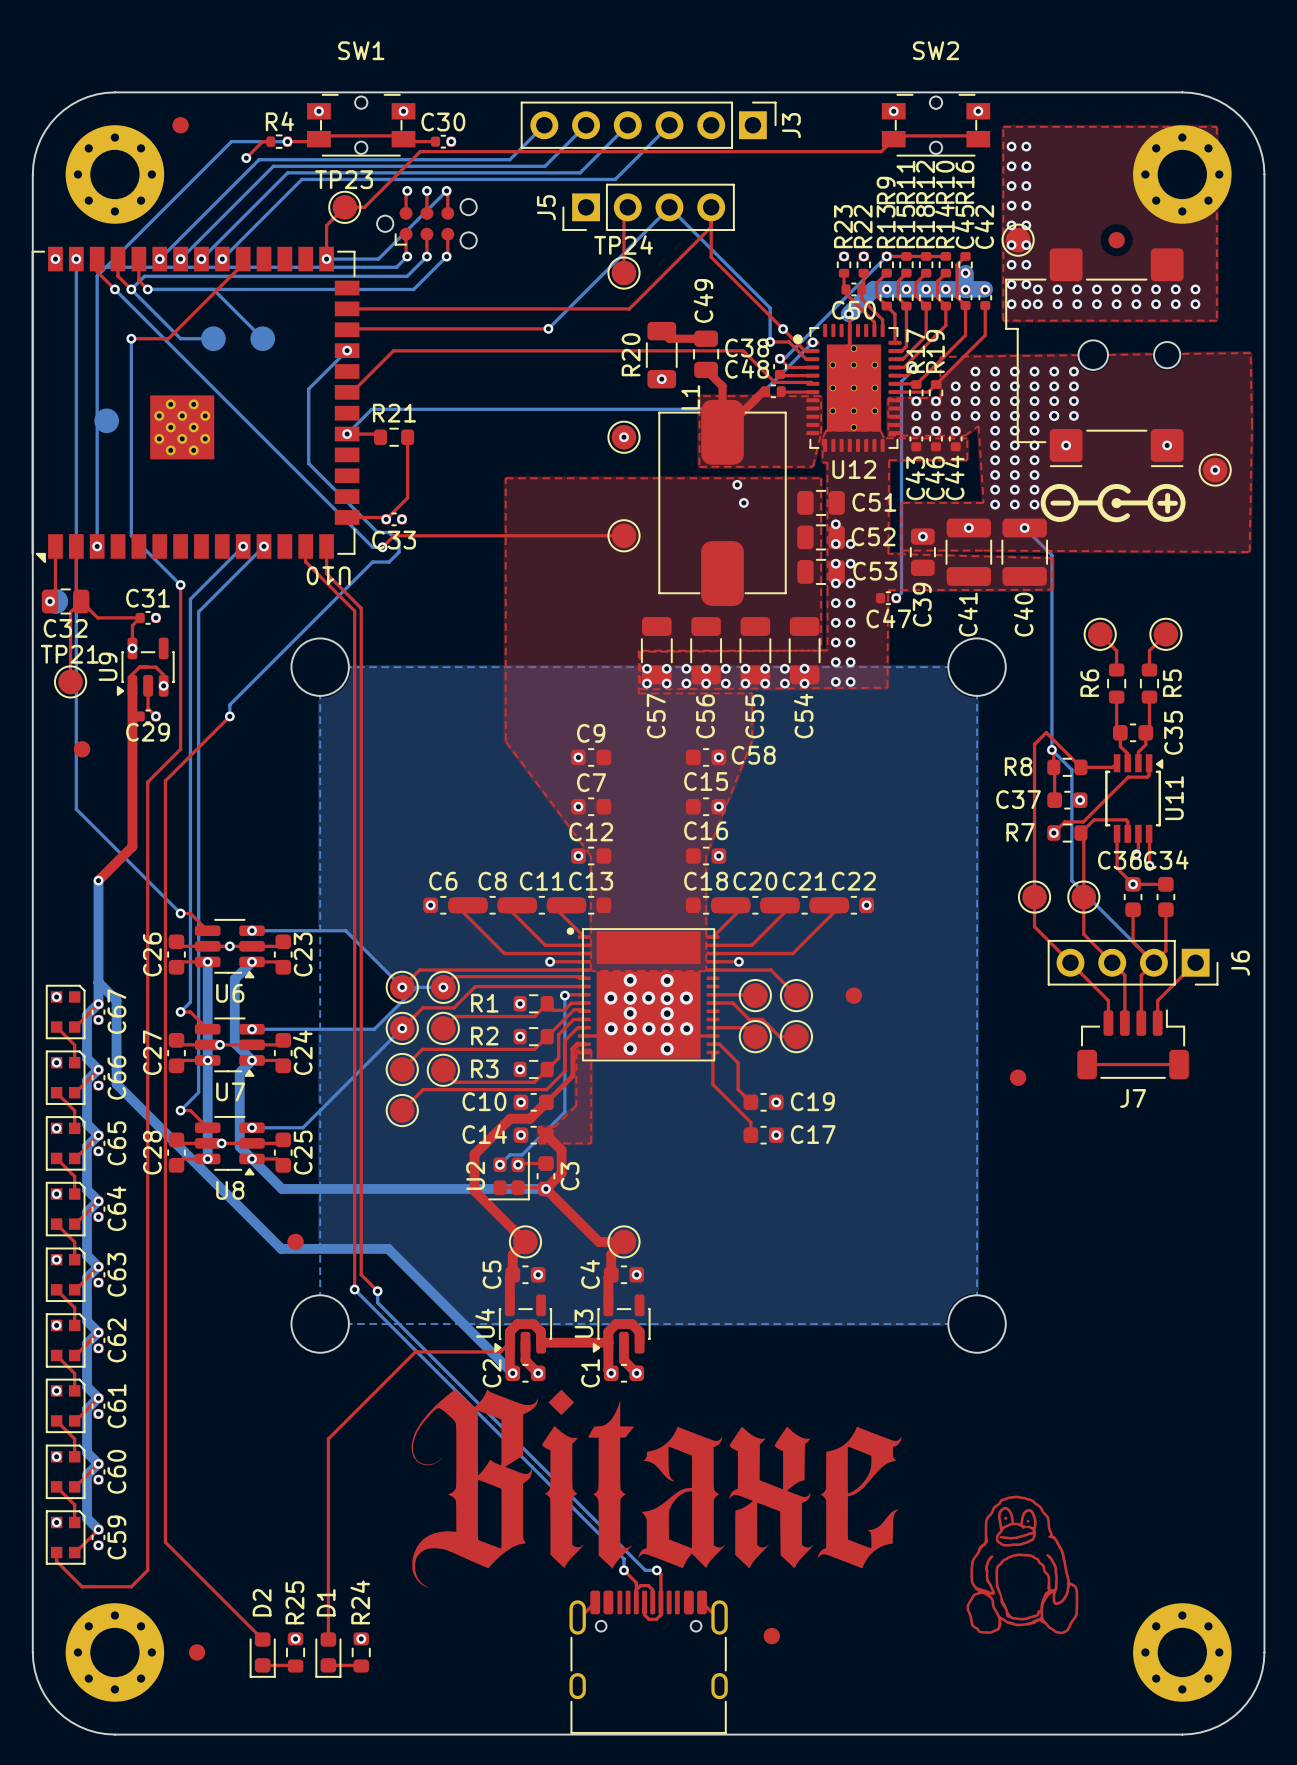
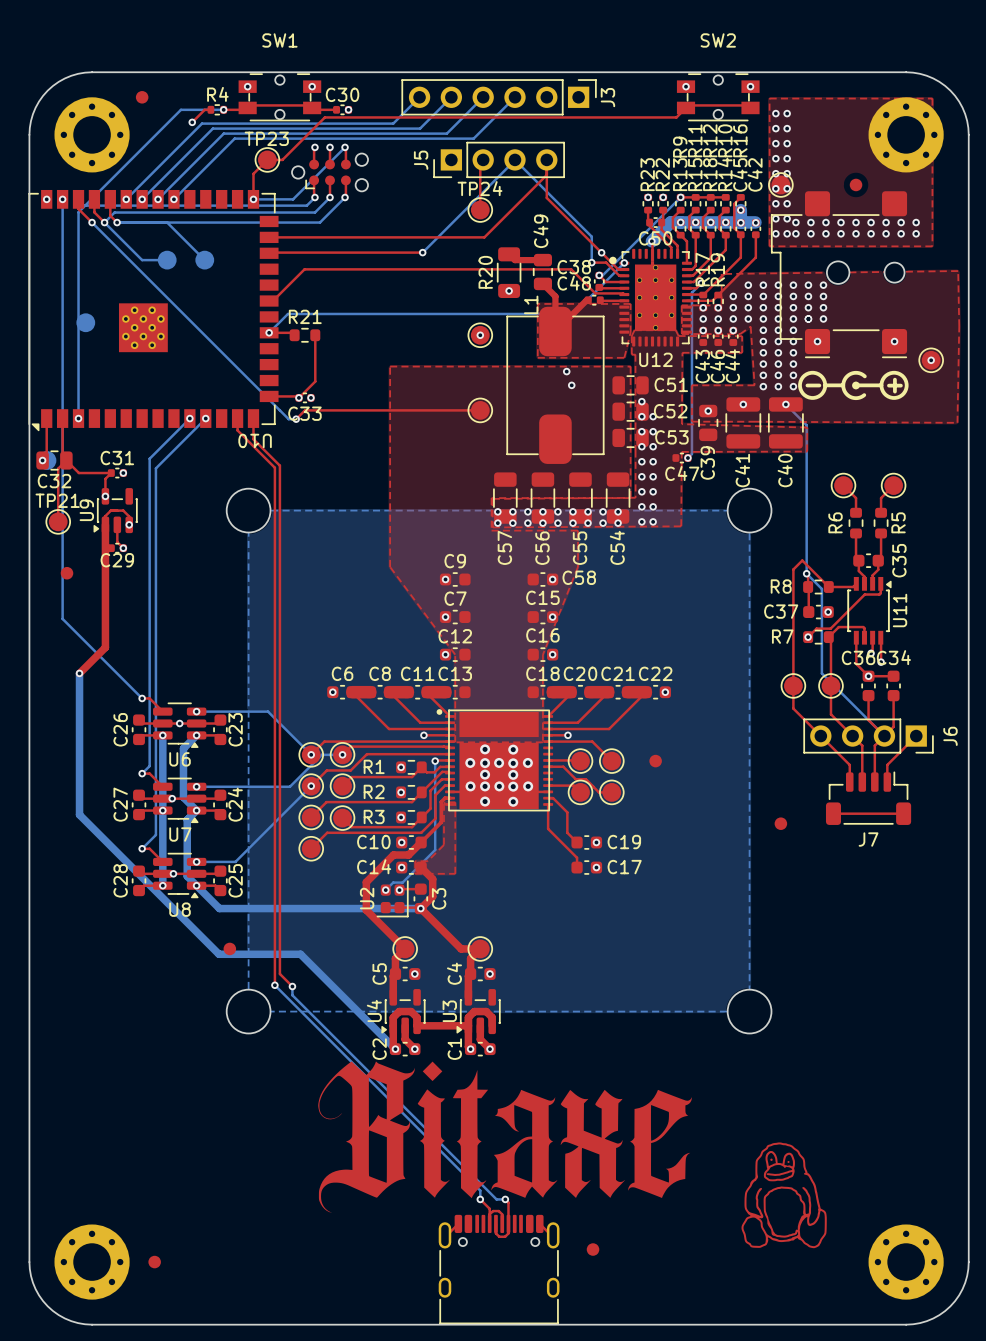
top track: (243, 259) (243, 263) (168, 338) (131, 338) -> none
bottom track: (131, 338) (131, 535) (180, 585) -> none
via: (131, 338) -> none
bottom track: (347, 350) (308, 389) (308, 463) (377, 532) (389, 532) (399, 542) (399, 552) (389, 562) (372, 562) (229, 704) (229, 716) -> none
via: (347, 350) -> none
top track: (180, 585) (180, 749) (147, 782) (147, 1570) (131, 1586) (82, 1586) (56, 1561) (56, 1552) -> none
via: (180, 585) -> none
top track: (229, 716) (165, 780) (165, 1542) (262, 1639) -> none
via: (229, 716) -> none
bottom track: (98, 982) (116, 1000) (116, 1084) -> (79, 767) (79, 814) (93, 828)
via: (56, 996) -> none
top track: (98, 1004) (74, 1027) -> none
bottom track: (98, 1004) (86, 1015) (86, 1058) (98, 1069) (86, 1080) (86, 1124) (98, 1135) (86, 1146) (86, 1189) (98, 1201) (86, 1212) (86, 1255) (98, 1266) (86, 1277) (86, 1321) (98, 1332) (86, 1343) (86, 1386) (98, 1398) (86, 1409) (86, 1452) (98, 1463) (86, 1474) (86, 1518) (98, 1529) -> none
via: (98, 1004) -> none
part: (65, 1012) -> none
C67: (98, 1012) -> none
via: (98, 1019) -> none
top track: (56, 1027) (74, 1045) (74, 1062) -> none
via: (56, 1062) -> none
top track: (98, 1069) (74, 1092) -> none
via: (98, 1069) -> none
part: (65, 1077) -> none
C66: (98, 1077) -> none
via: (98, 1085) -> none
top track: (56, 1092) (74, 1110) (74, 1128) -> none
via: (56, 1128) -> none
top track: (98, 1135) (74, 1158) -> none
via: (98, 1135) -> none
part: (65, 1143) -> none
C65: (98, 1143) -> none
via: (98, 1151) -> none
top track: (56, 1158) (74, 1176) (74, 1194) -> none
via: (56, 1194) -> none
top track: (98, 1201) (74, 1224) -> none
via: (98, 1201) -> none
part: (65, 1209) -> none
C64: (98, 1209) -> none
via: (98, 1216) -> none
top track: (56, 1224) (74, 1242) (74, 1259) -> none
via: (56, 1259) -> none
top track: (98, 1266) (74, 1289) -> none
via: (98, 1266) -> none
part: (65, 1274) -> none
C63: (98, 1274) -> none
via: (98, 1282) -> none
top track: (56, 1289) (74, 1307) (74, 1325) -> none
via: (56, 1325) -> none
top track: (98, 1332) (74, 1355) -> none
via: (98, 1332) -> none
part: (65, 1340) -> none
C62: (98, 1340) -> none
top track: (509, 1342) (500, 1351) (415, 1351) (328, 1438) (328, 1639) -> none
via: (98, 1348) -> none
top track: (56, 1355) (74, 1373) (74, 1390) -> none
via: (56, 1390) -> none
top track: (98, 1398) (74, 1420) -> none
via: (98, 1398) -> none
part: (65, 1405) -> none
C61: (98, 1406) -> none
via: (98, 1414) -> none
top track: (56, 1420) (74, 1438) (74, 1456) -> none
via: (56, 1456) -> none
top track: (98, 1463) (74, 1486) -> none
via: (98, 1463) -> none
part: (65, 1471) -> none
C60: (98, 1471) -> none
via: (98, 1479) -> none
top track: (56, 1486) (74, 1504) (74, 1522) -> none
via: (56, 1522) -> none
top track: (98, 1529) (74, 1552) -> none
via: (98, 1529) -> none
part: (65, 1537) -> none
C59: (98, 1537) -> none
via: (98, 1545) -> none
via: (295, 1638) -> none
via: (361, 1638) -> none
R25: (295, 1652) -> none
R24: (361, 1652) -> none
D2: (262, 1655) -> none
D1: (328, 1655) -> none
top track: (262, 1665) (295, 1666) -> none
top track: (328, 1665) (361, 1666) -> none

